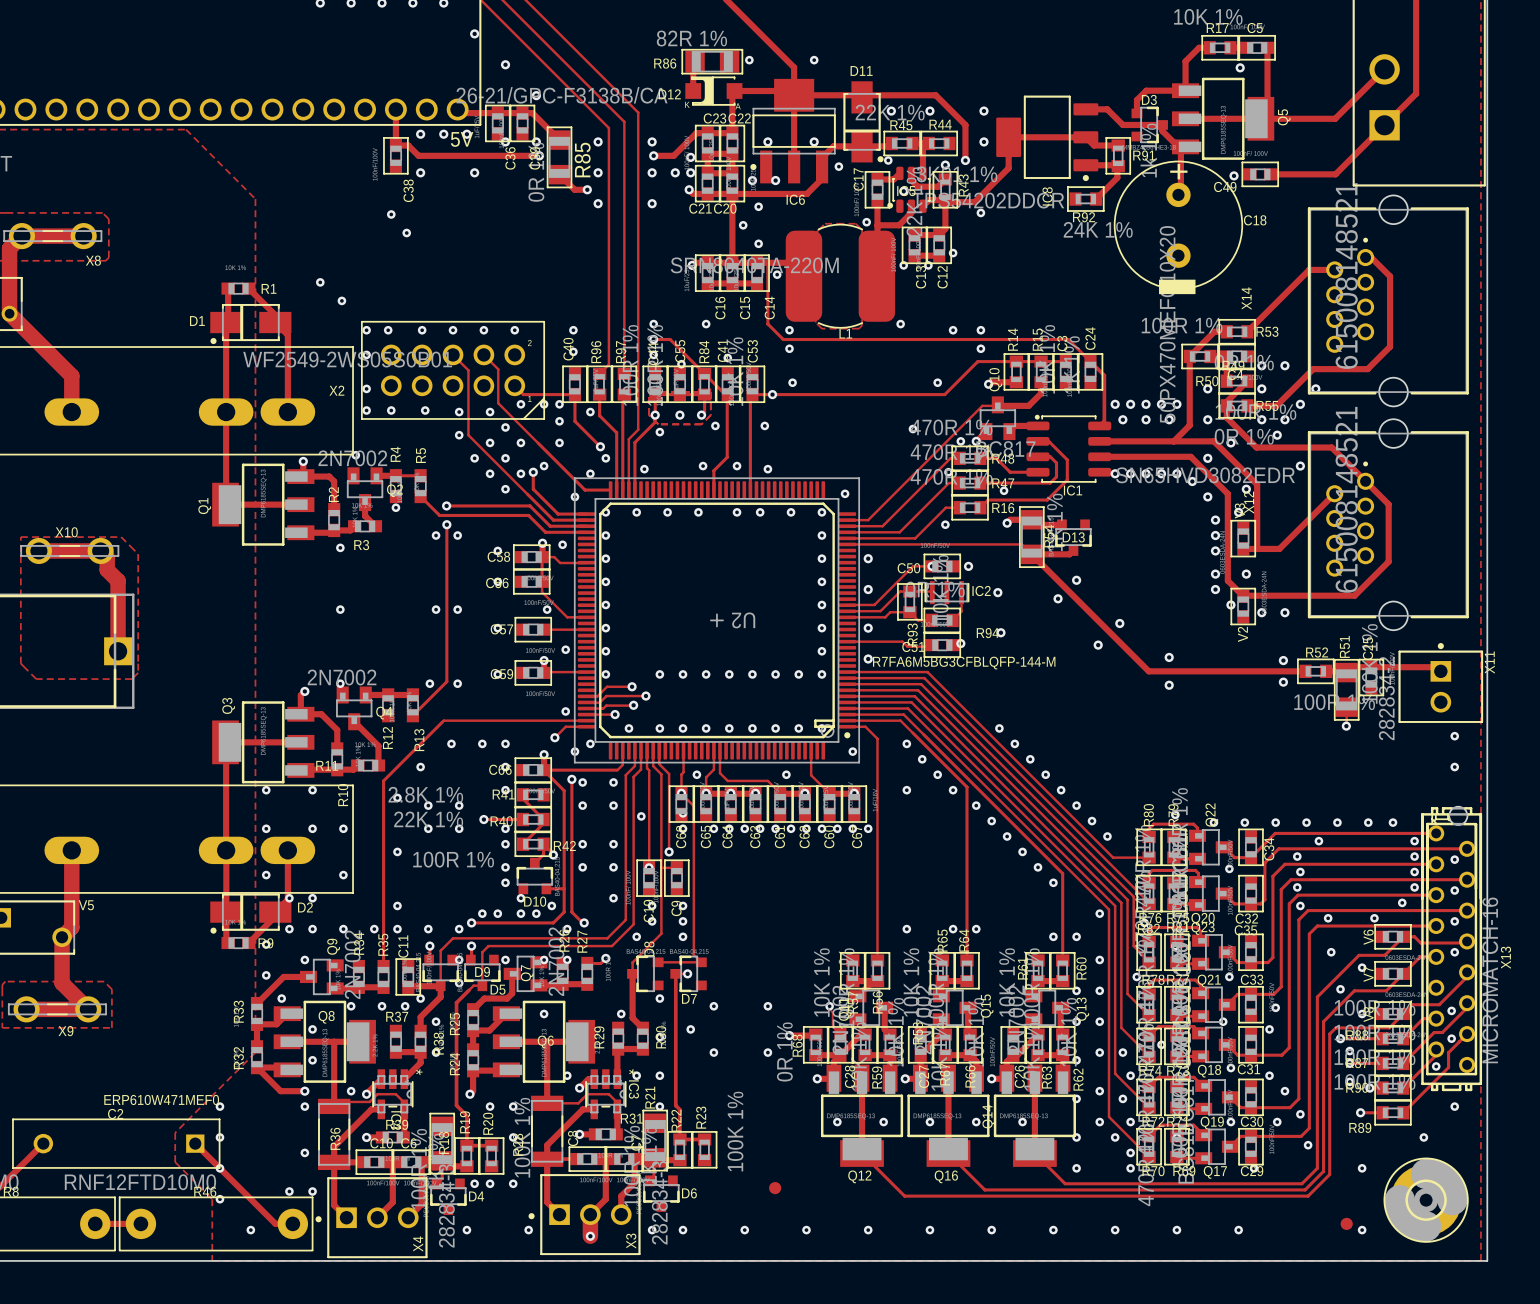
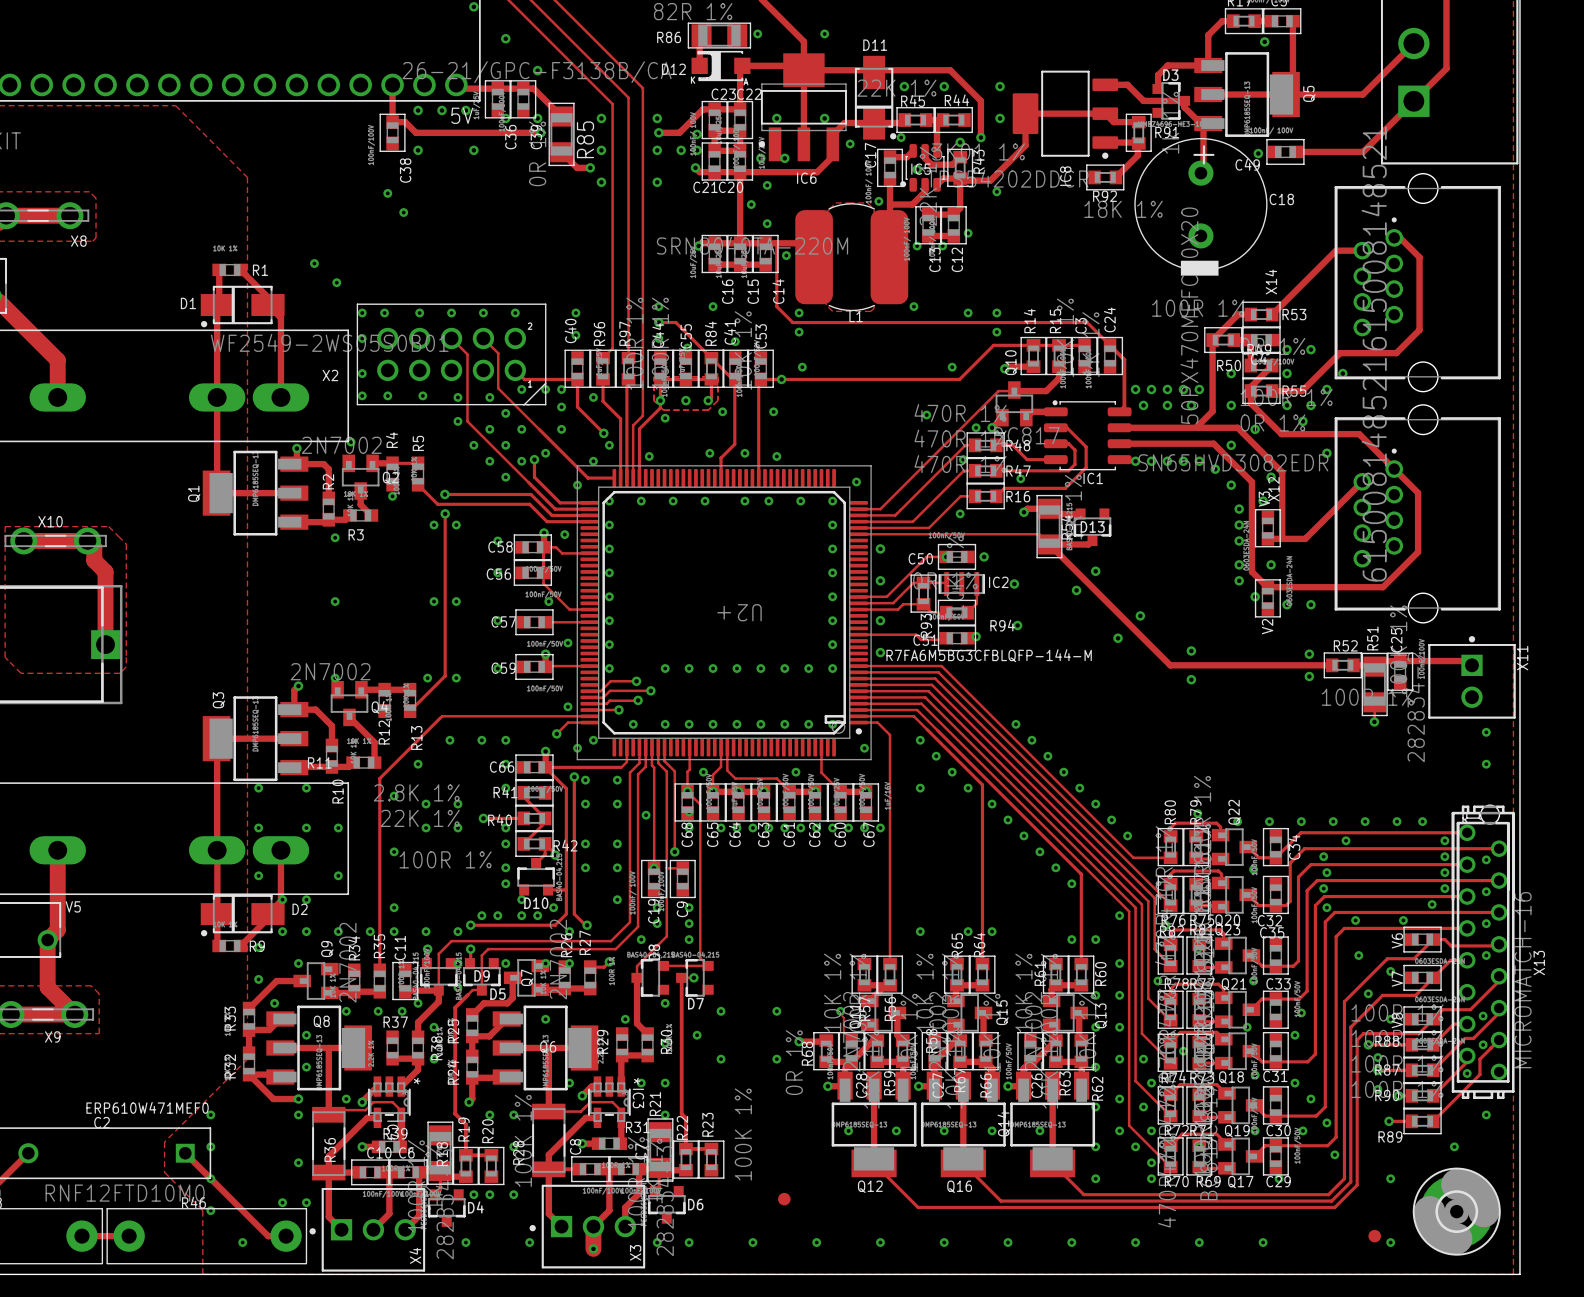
R92 value: 24K 1% (1098, 229) -> 18K 1% (1123, 209)

